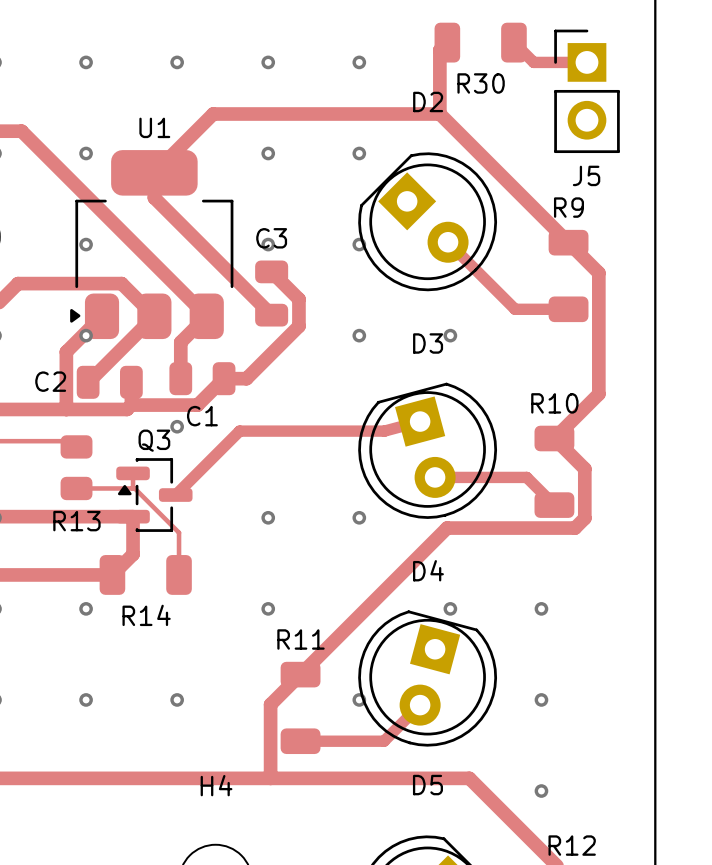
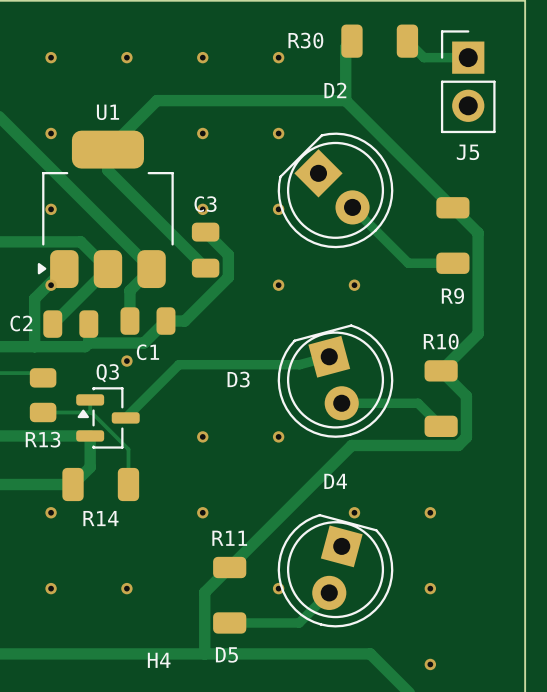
R30 name position: R30 (481, 83) -> R30 (305, 40)
R9 name position: R9 (568, 207) -> R9 (452, 296)
D3 name position: D3 (428, 343) -> D3 (238, 379)
D5 name position: D5 (427, 785) -> D5 (226, 654)

